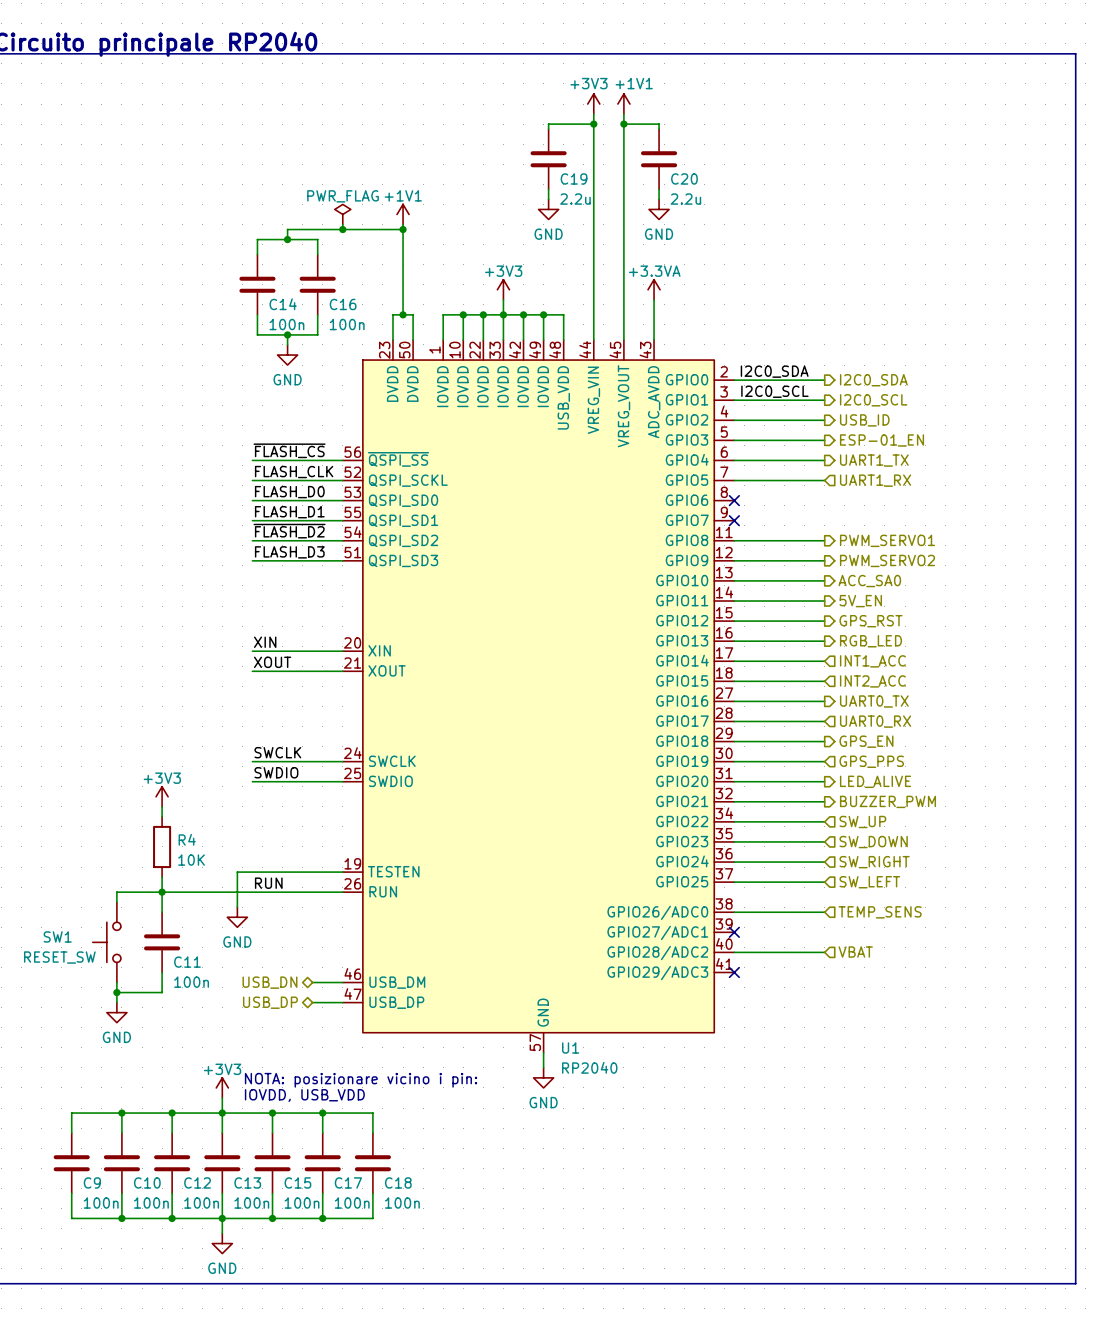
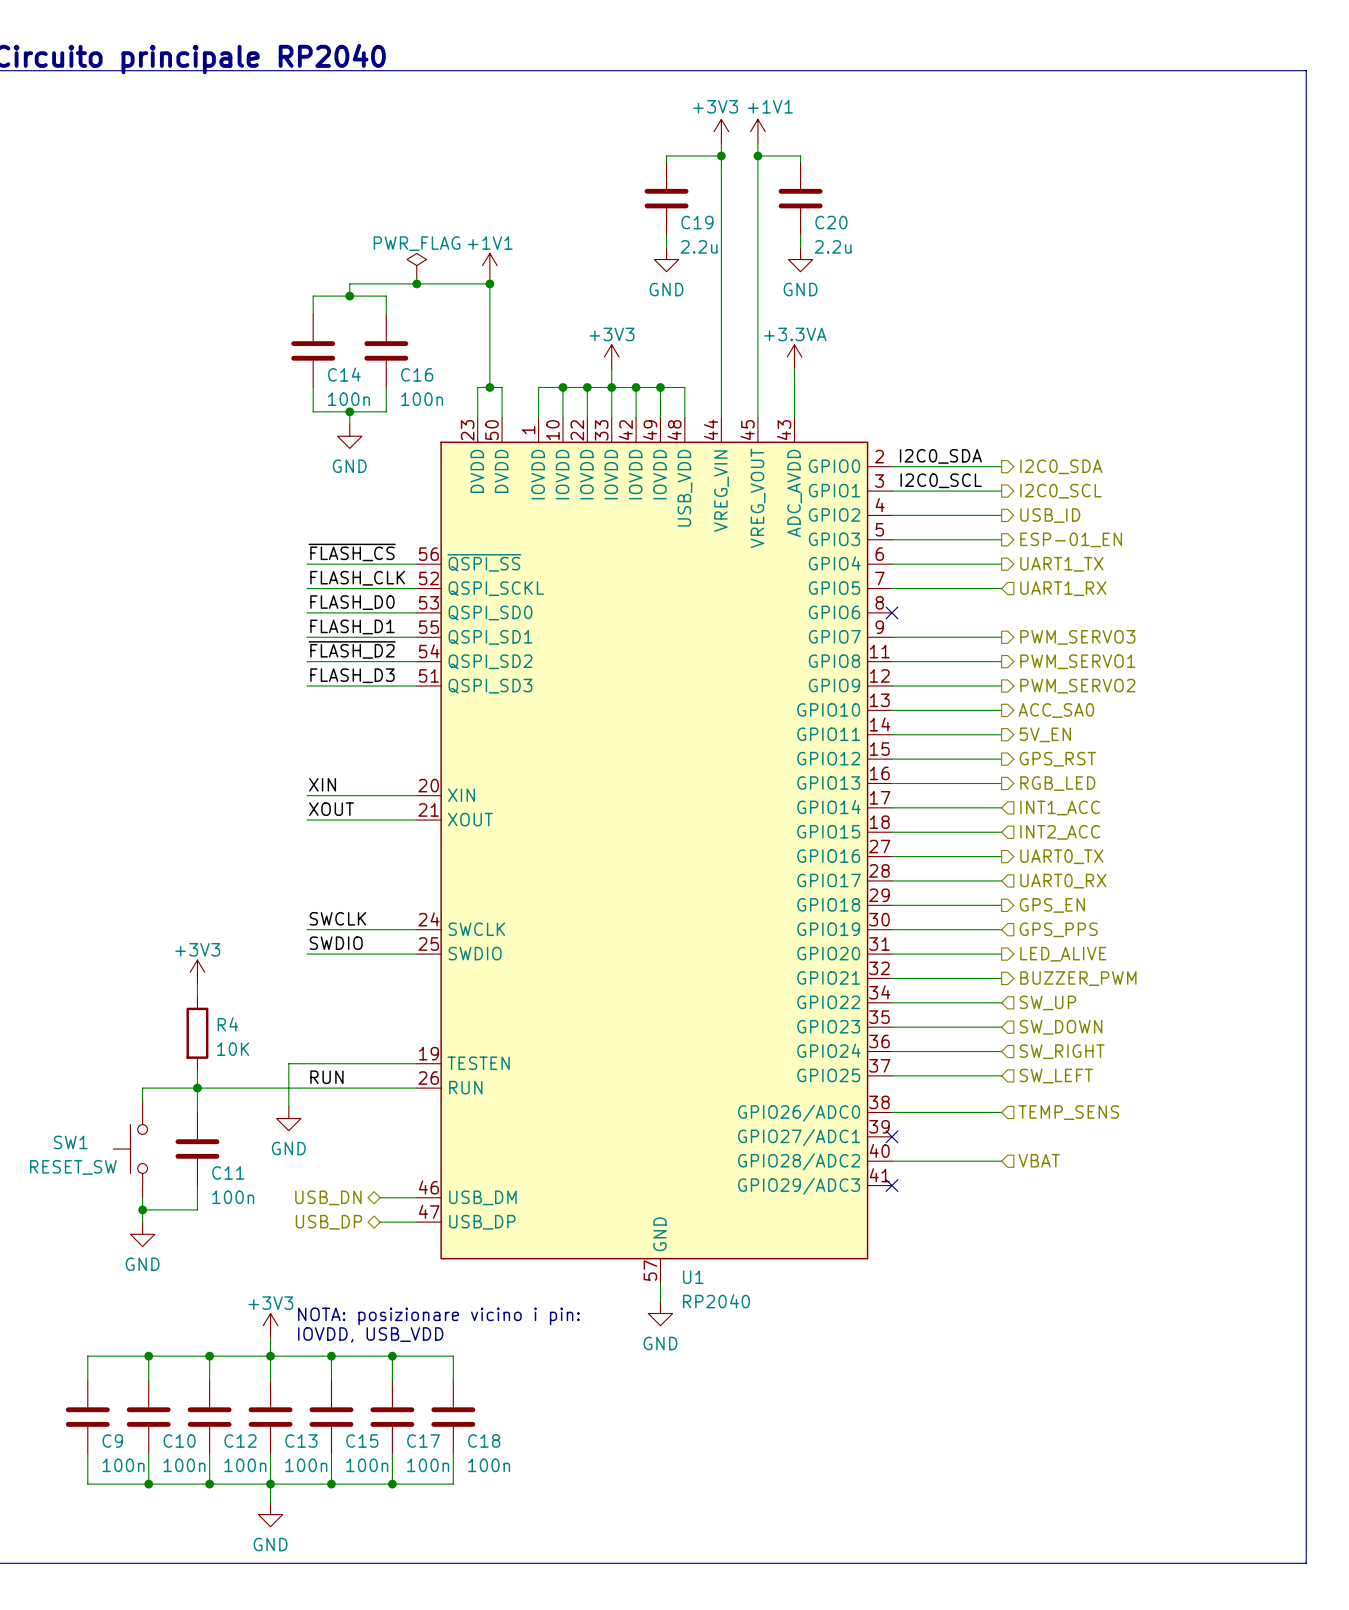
wire: none -> (891, 637) (1001, 637)
no-connect mark: (734, 520) -> none
hierarchical label: none -> PWM_SERVO3 (1077, 637)

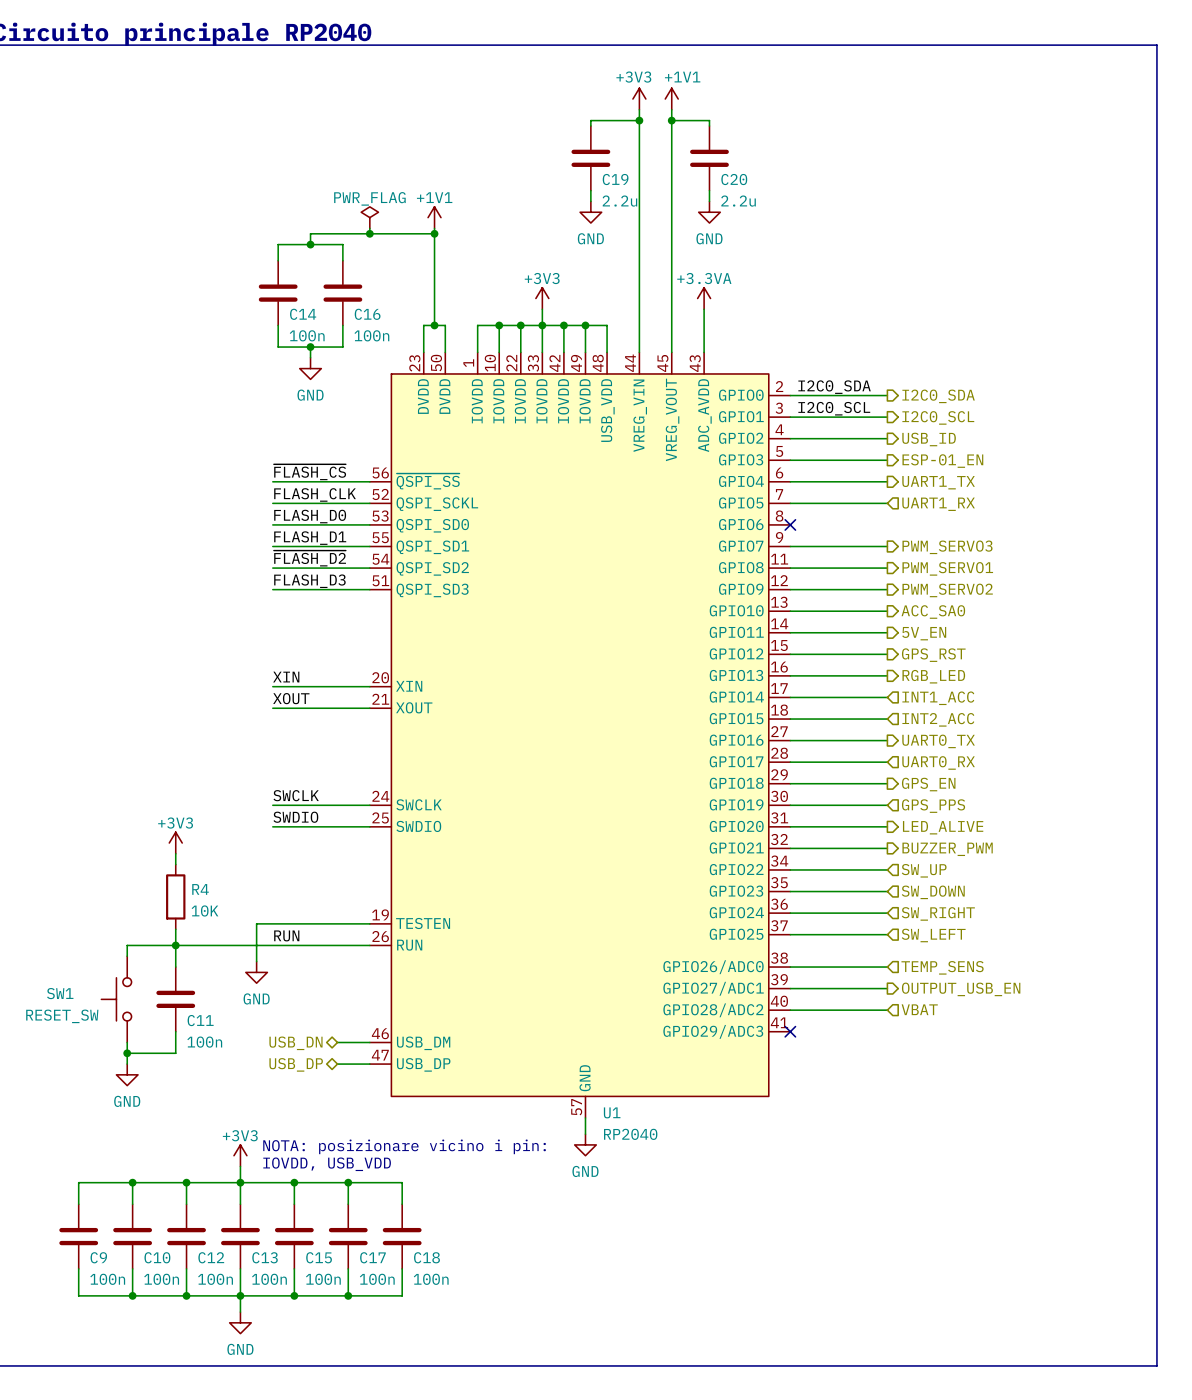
wire: none -> (790, 988) (887, 988)
no-connect mark: (891, 1136) -> none
hierarchical label: none -> OUTPUT_USB_EN (961, 989)

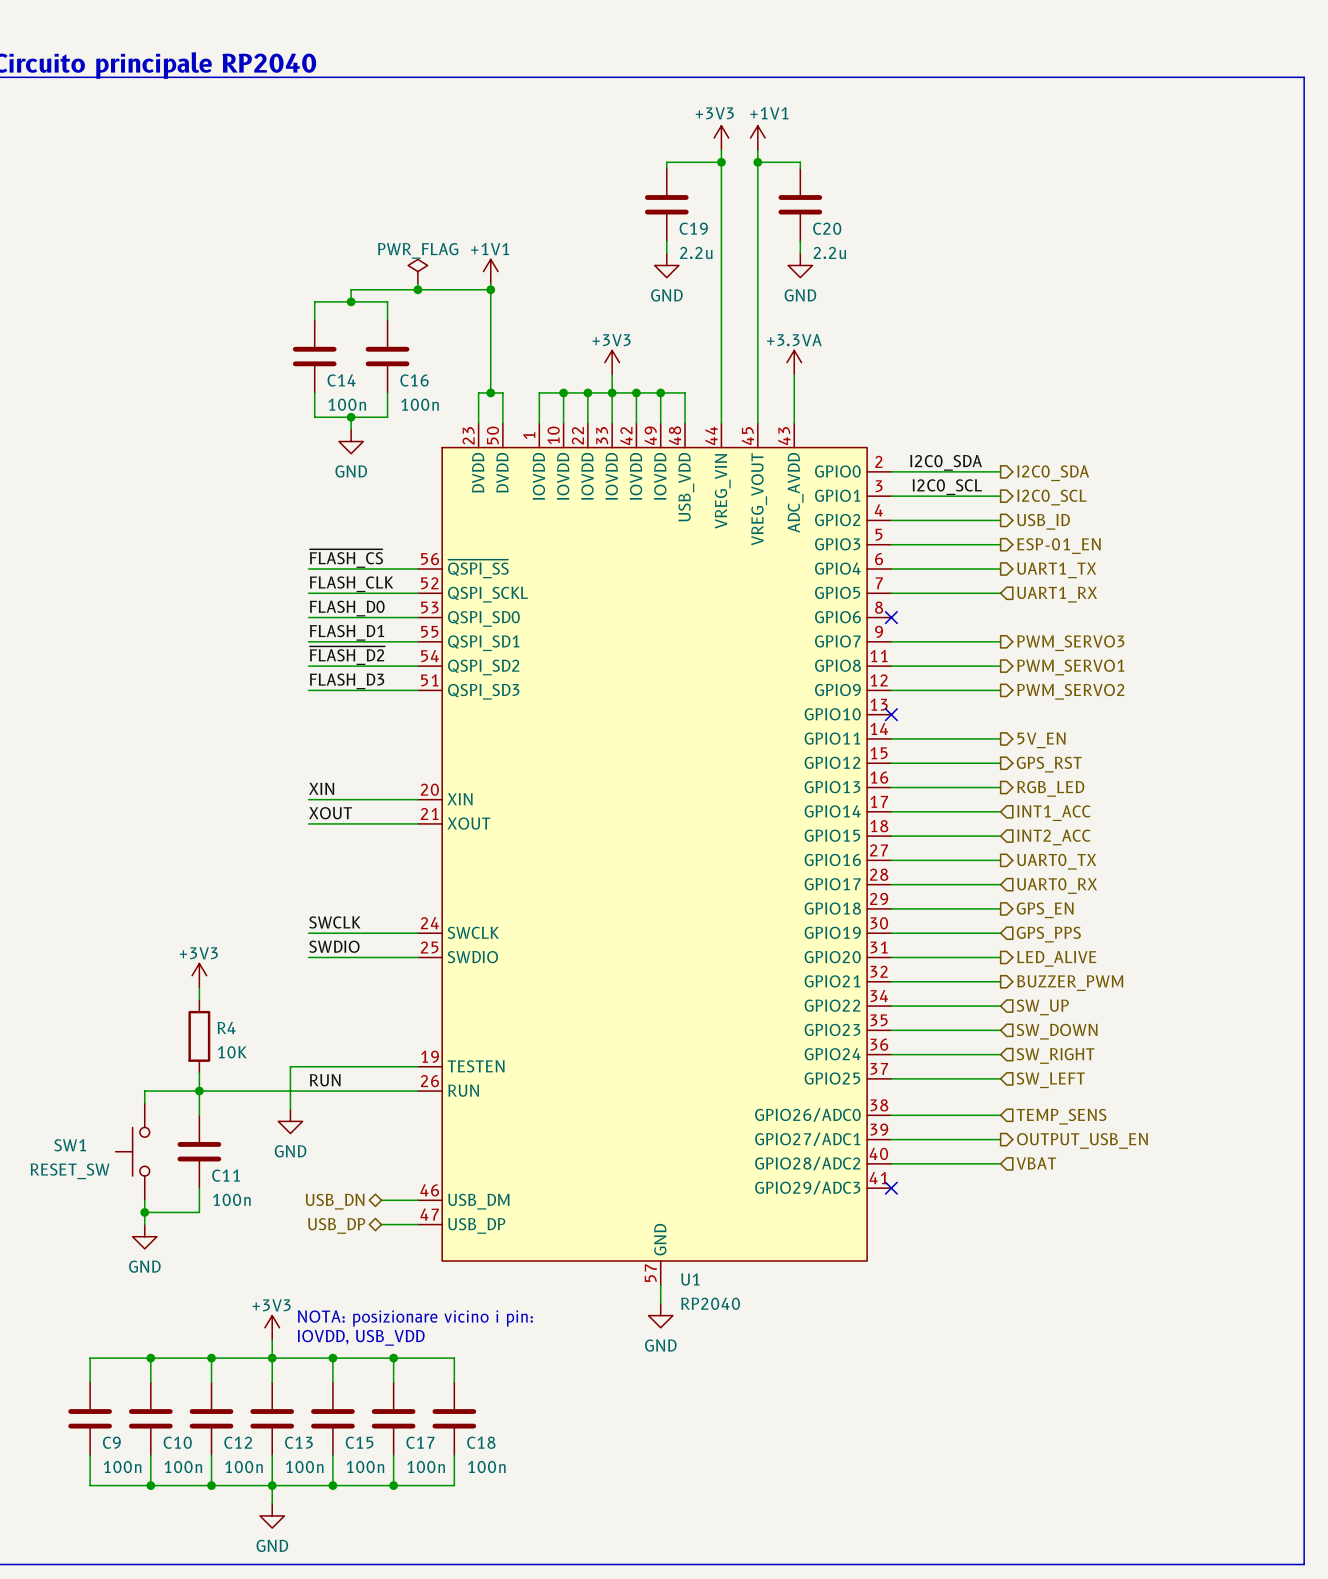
wire: (790, 611) (887, 611) -> none
no-connect mark: none -> (891, 714)
hierarchical label: ACC_SA0 (933, 612) -> none

